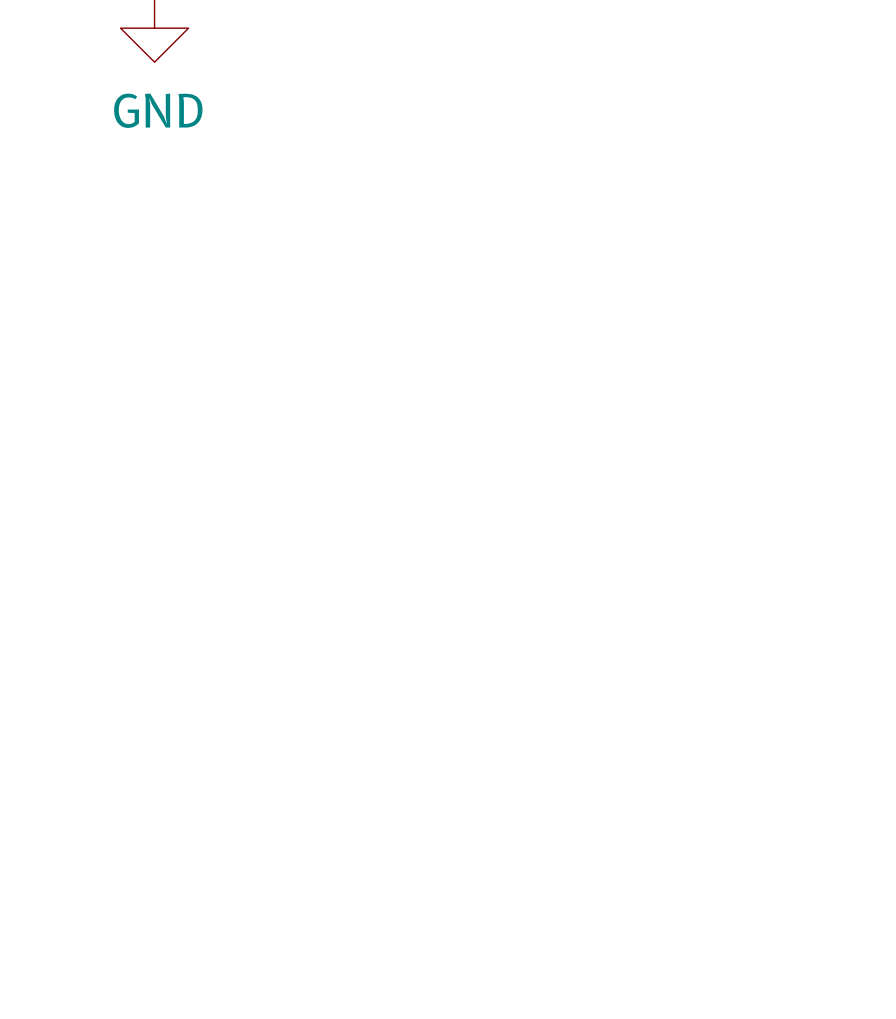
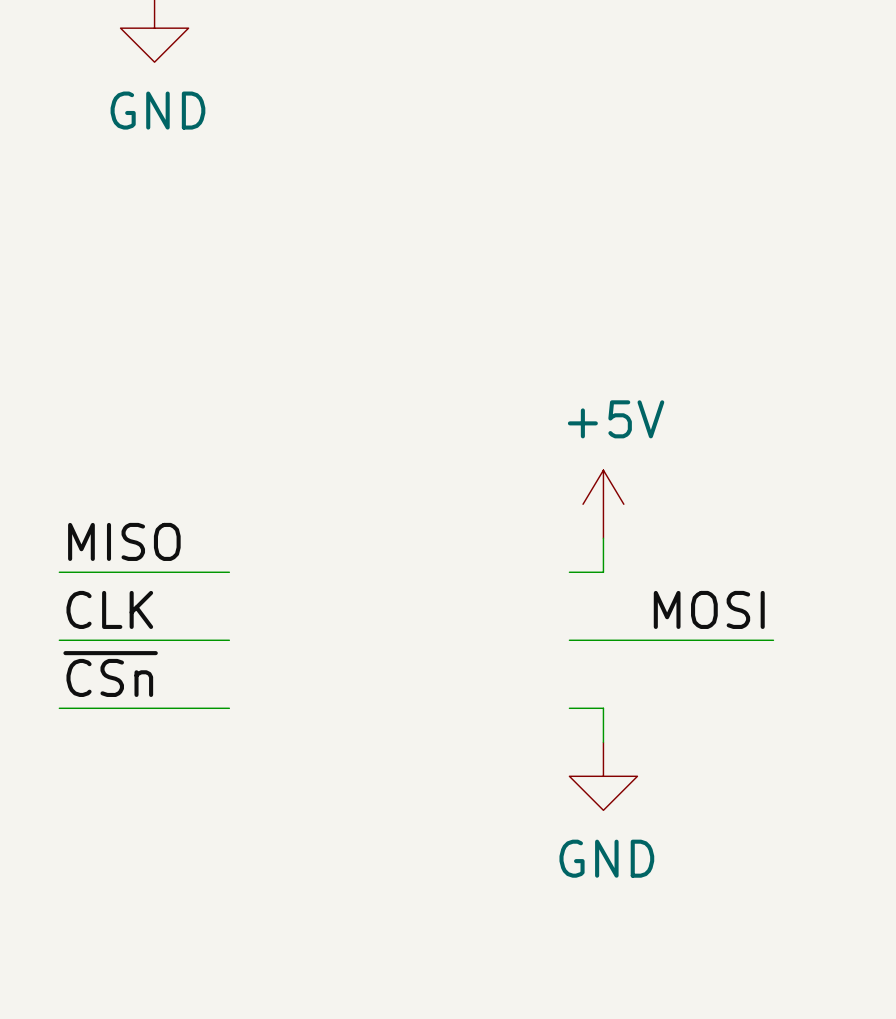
power symbol: none -> +5V (603, 504)
wire: none -> (603, 538) (603, 572) (569, 572)
label: none -> MISO (124, 541)
wire: none -> (59, 572) (229, 572)
label: none -> CLK (109, 609)
label: none -> MOSI (709, 609)
wire: none -> (59, 640) (229, 640)
wire: none -> (569, 640) (773, 640)
label: none -> ~{CSn} (110, 674)
wire: none -> (59, 708) (229, 708)
wire: none -> (569, 708) (603, 708) (603, 742)
power symbol: none -> GND (603, 776)

